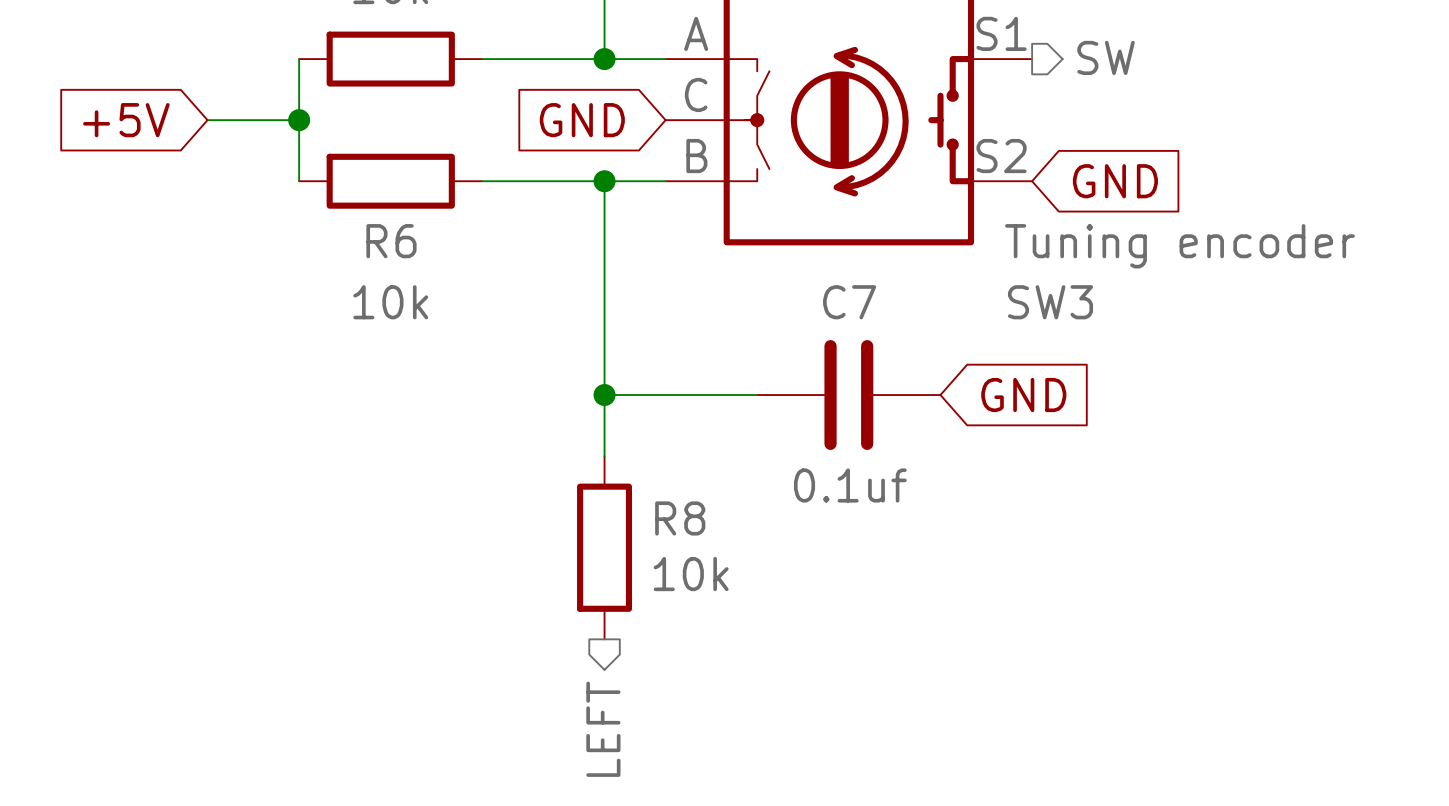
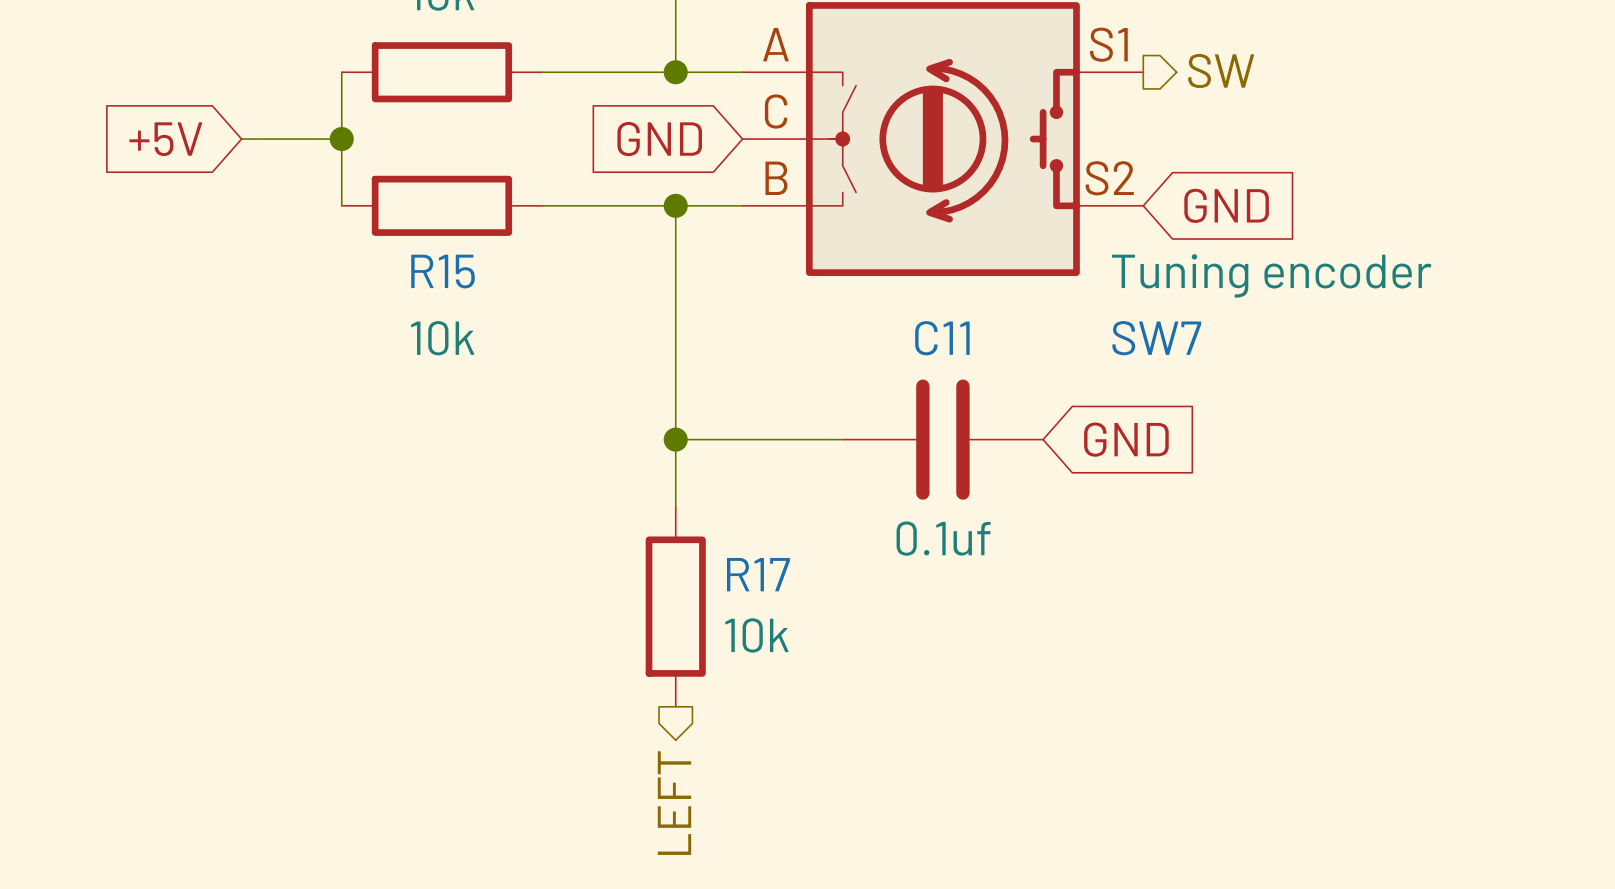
R6 name: R6 (391, 241) -> R15 (443, 271)
C7 name: C7 (849, 302) -> C11 (942, 338)
SW3 name: SW3 (1050, 302) -> SW7 (1156, 338)
R8 name: R8 (680, 518) -> R17 (758, 574)

